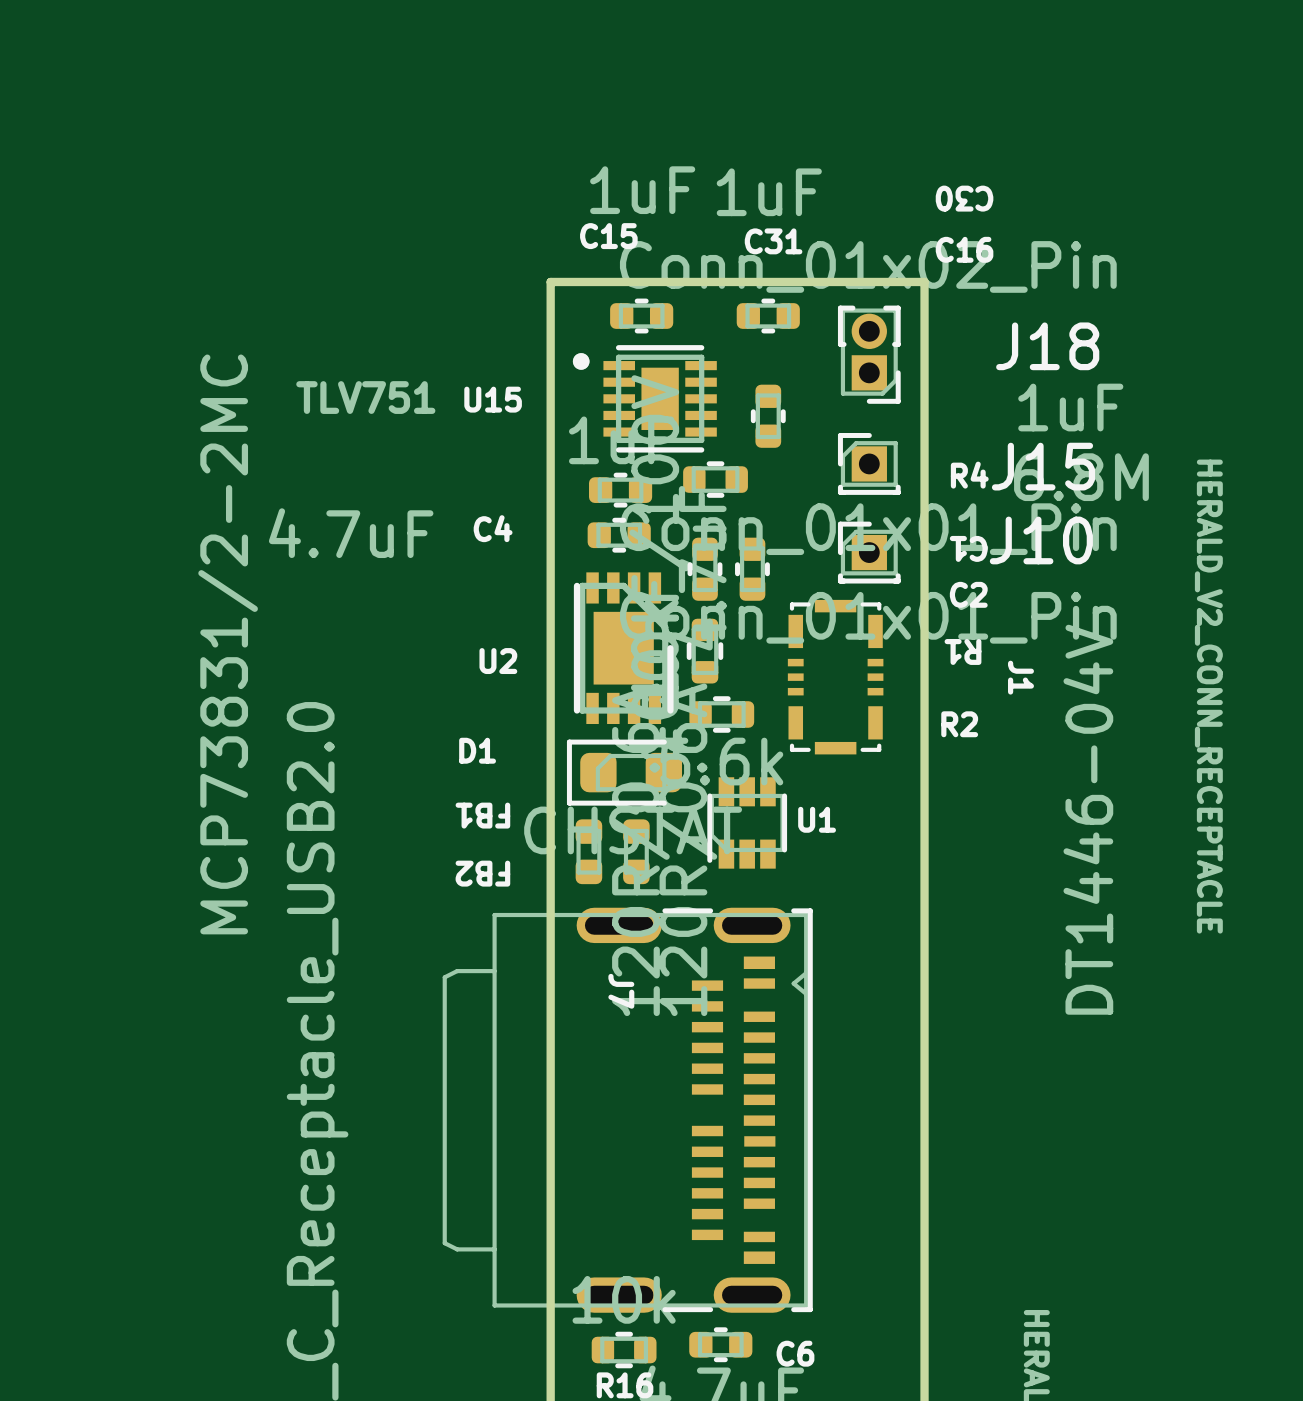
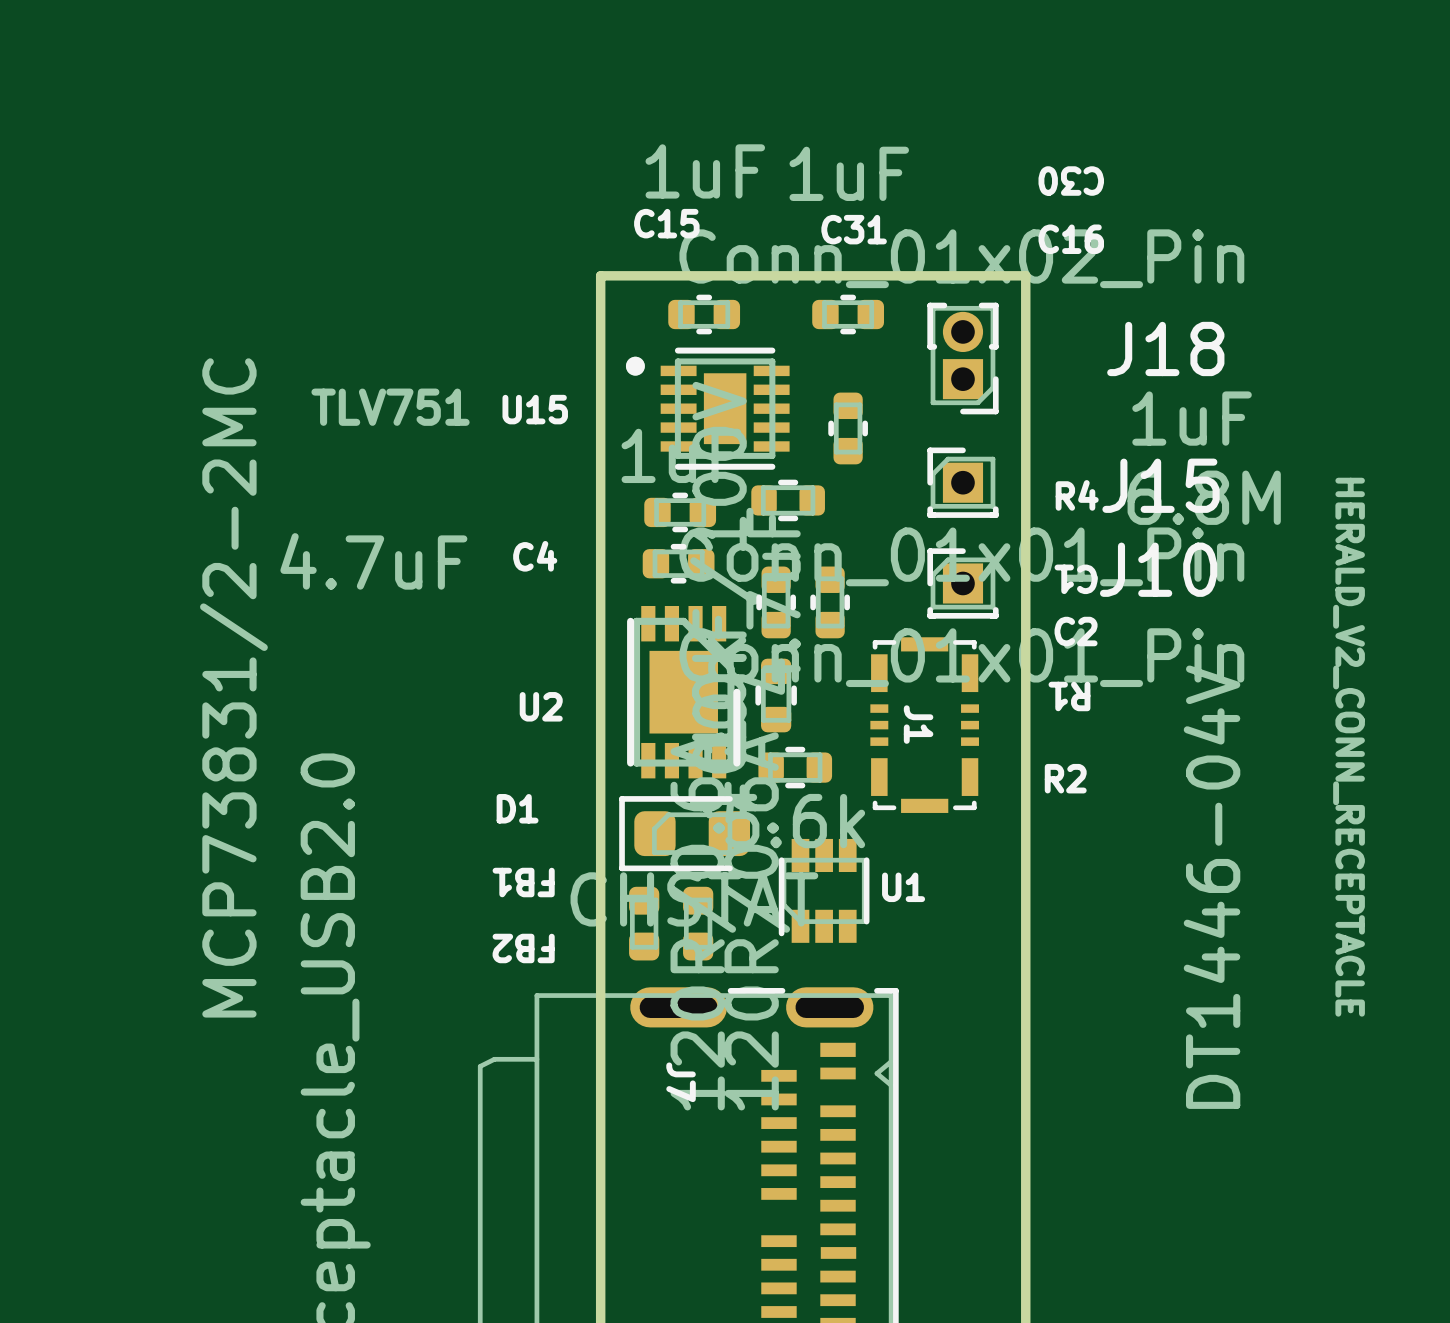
J1 name position: J1 (1020, 677) -> J1 (918, 724)

